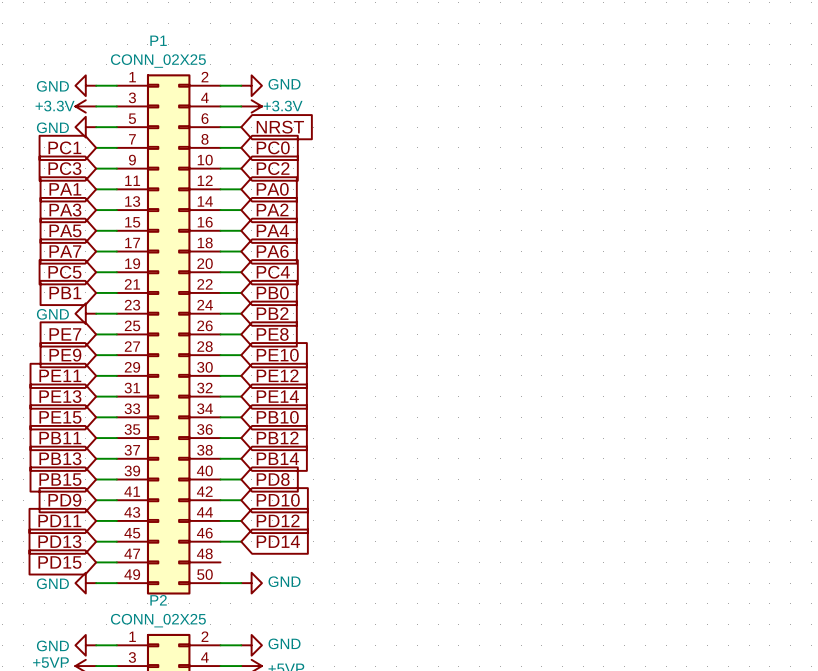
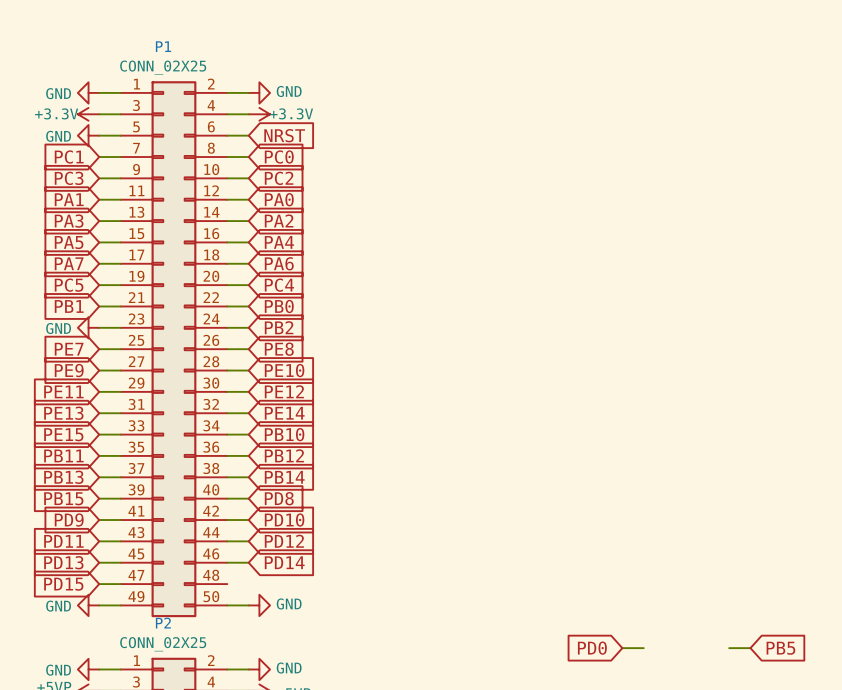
global label: none -> PD0 (592, 648)
wire: none -> (622, 648) (643, 648)
wire: none -> (729, 648) (750, 648)
global label: none -> PB5 (780, 648)

